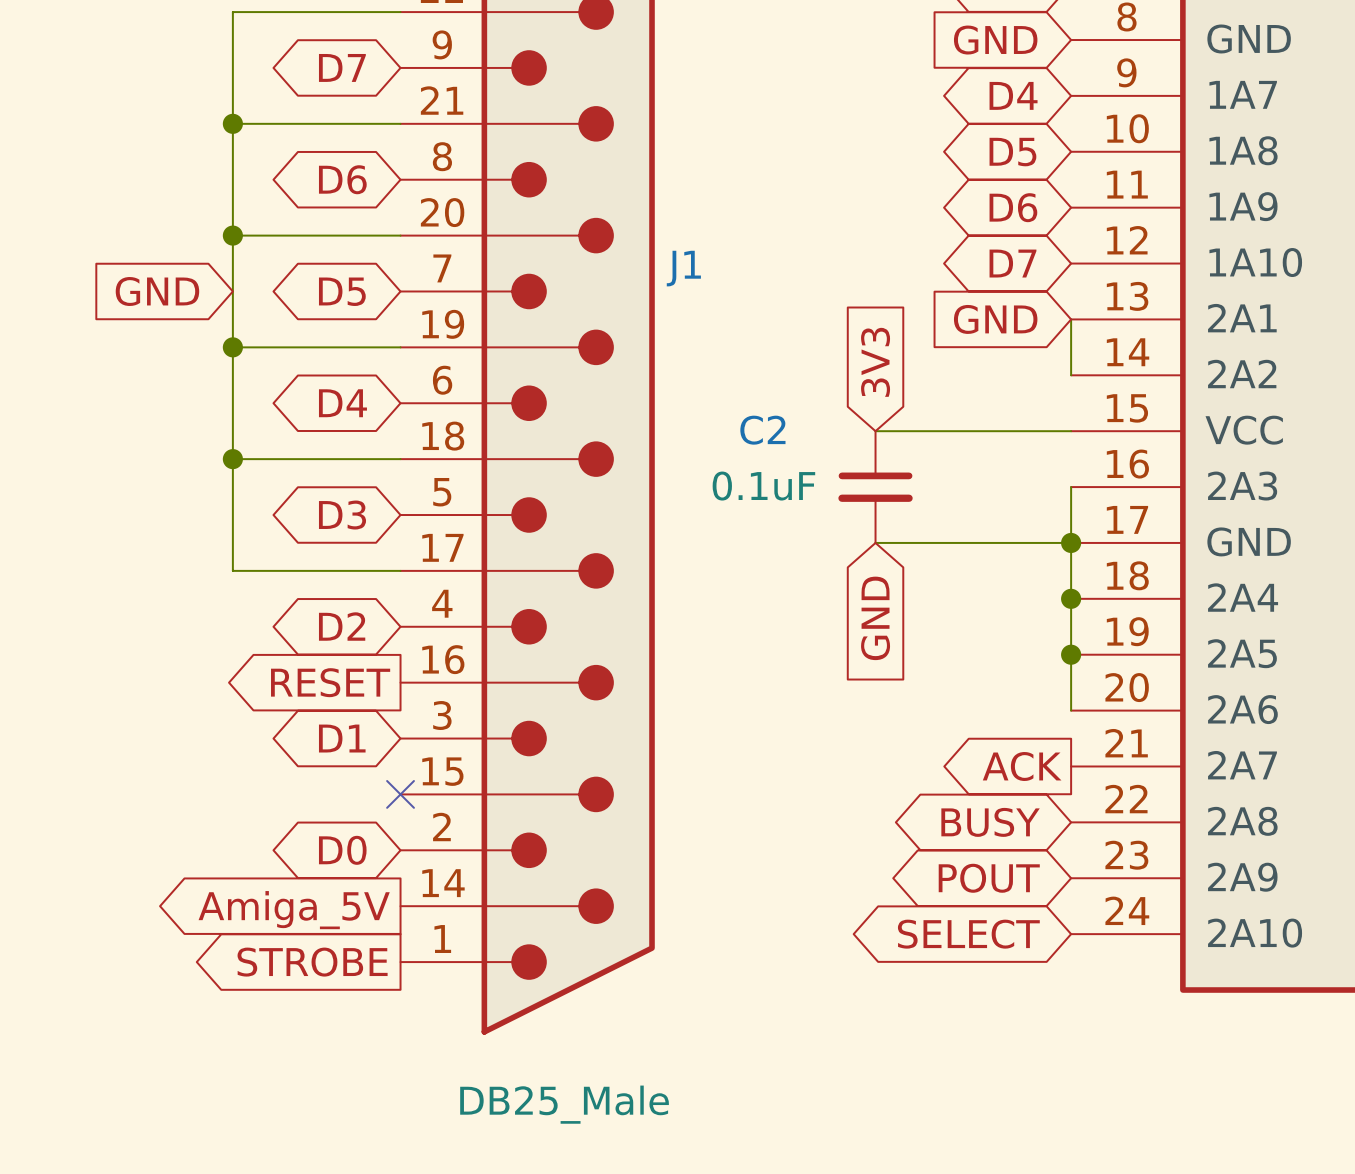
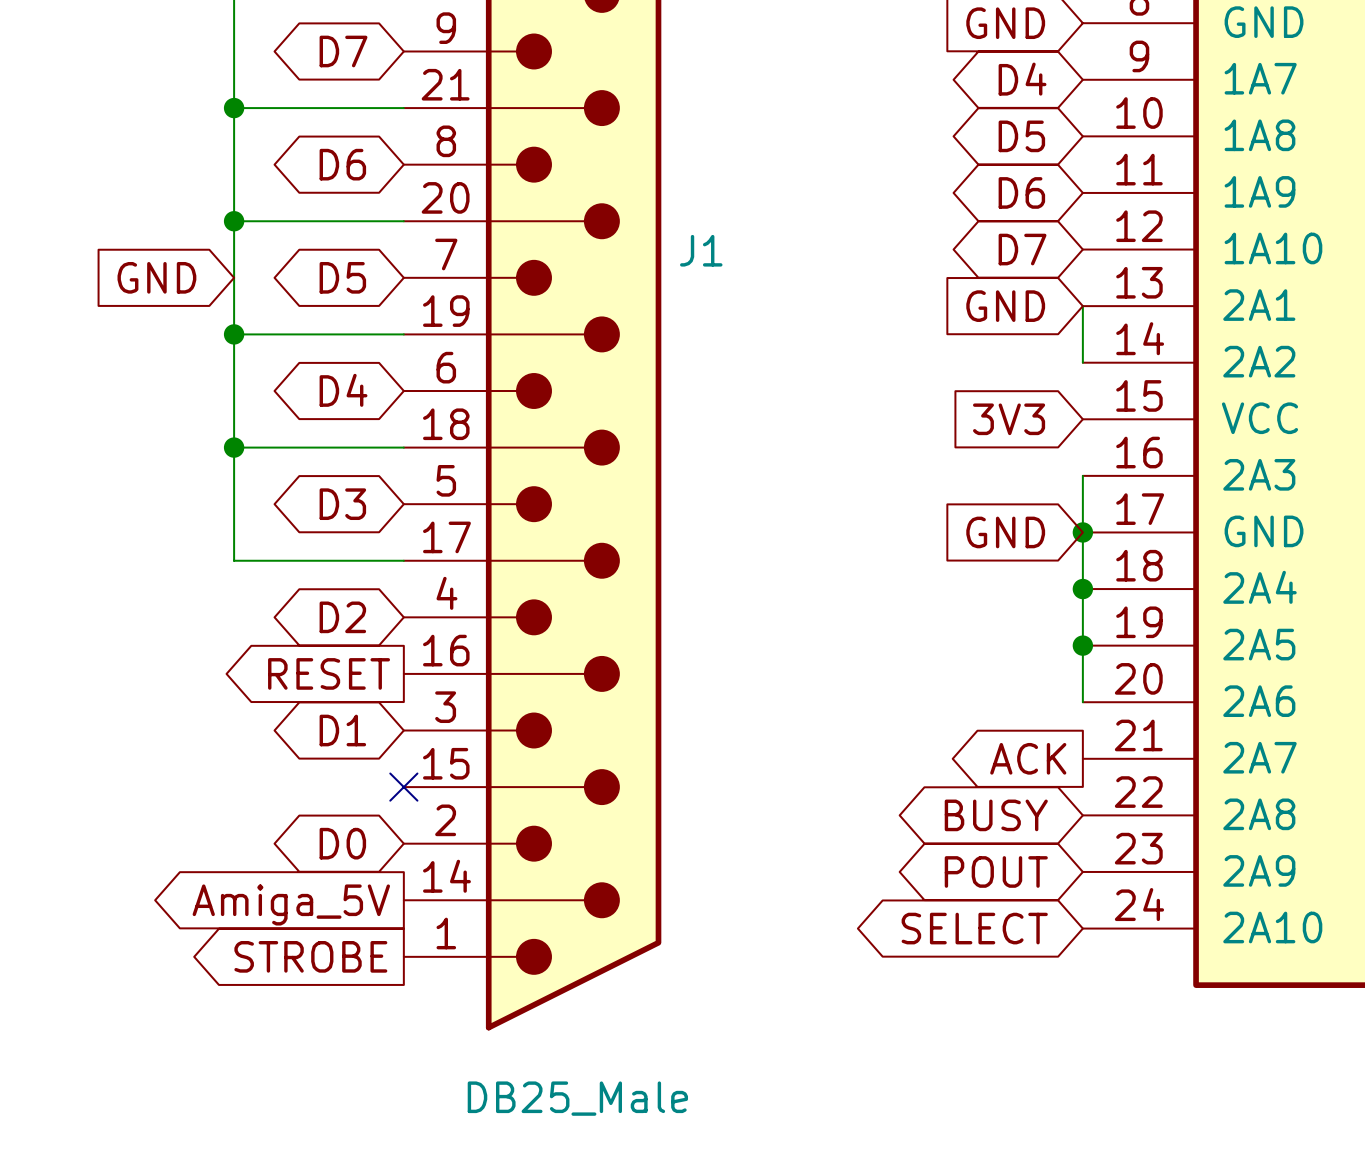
global label rotation: 0° (875, 362) -> 90° counterclockwise (1009, 419)
wire: (875, 431) (1071, 431) -> none
C2: 0.1uF (875, 487) -> none
wire: (875, 542) (1071, 542) -> none
global label rotation: 0° (875, 618) -> 90° clockwise (1005, 532)

